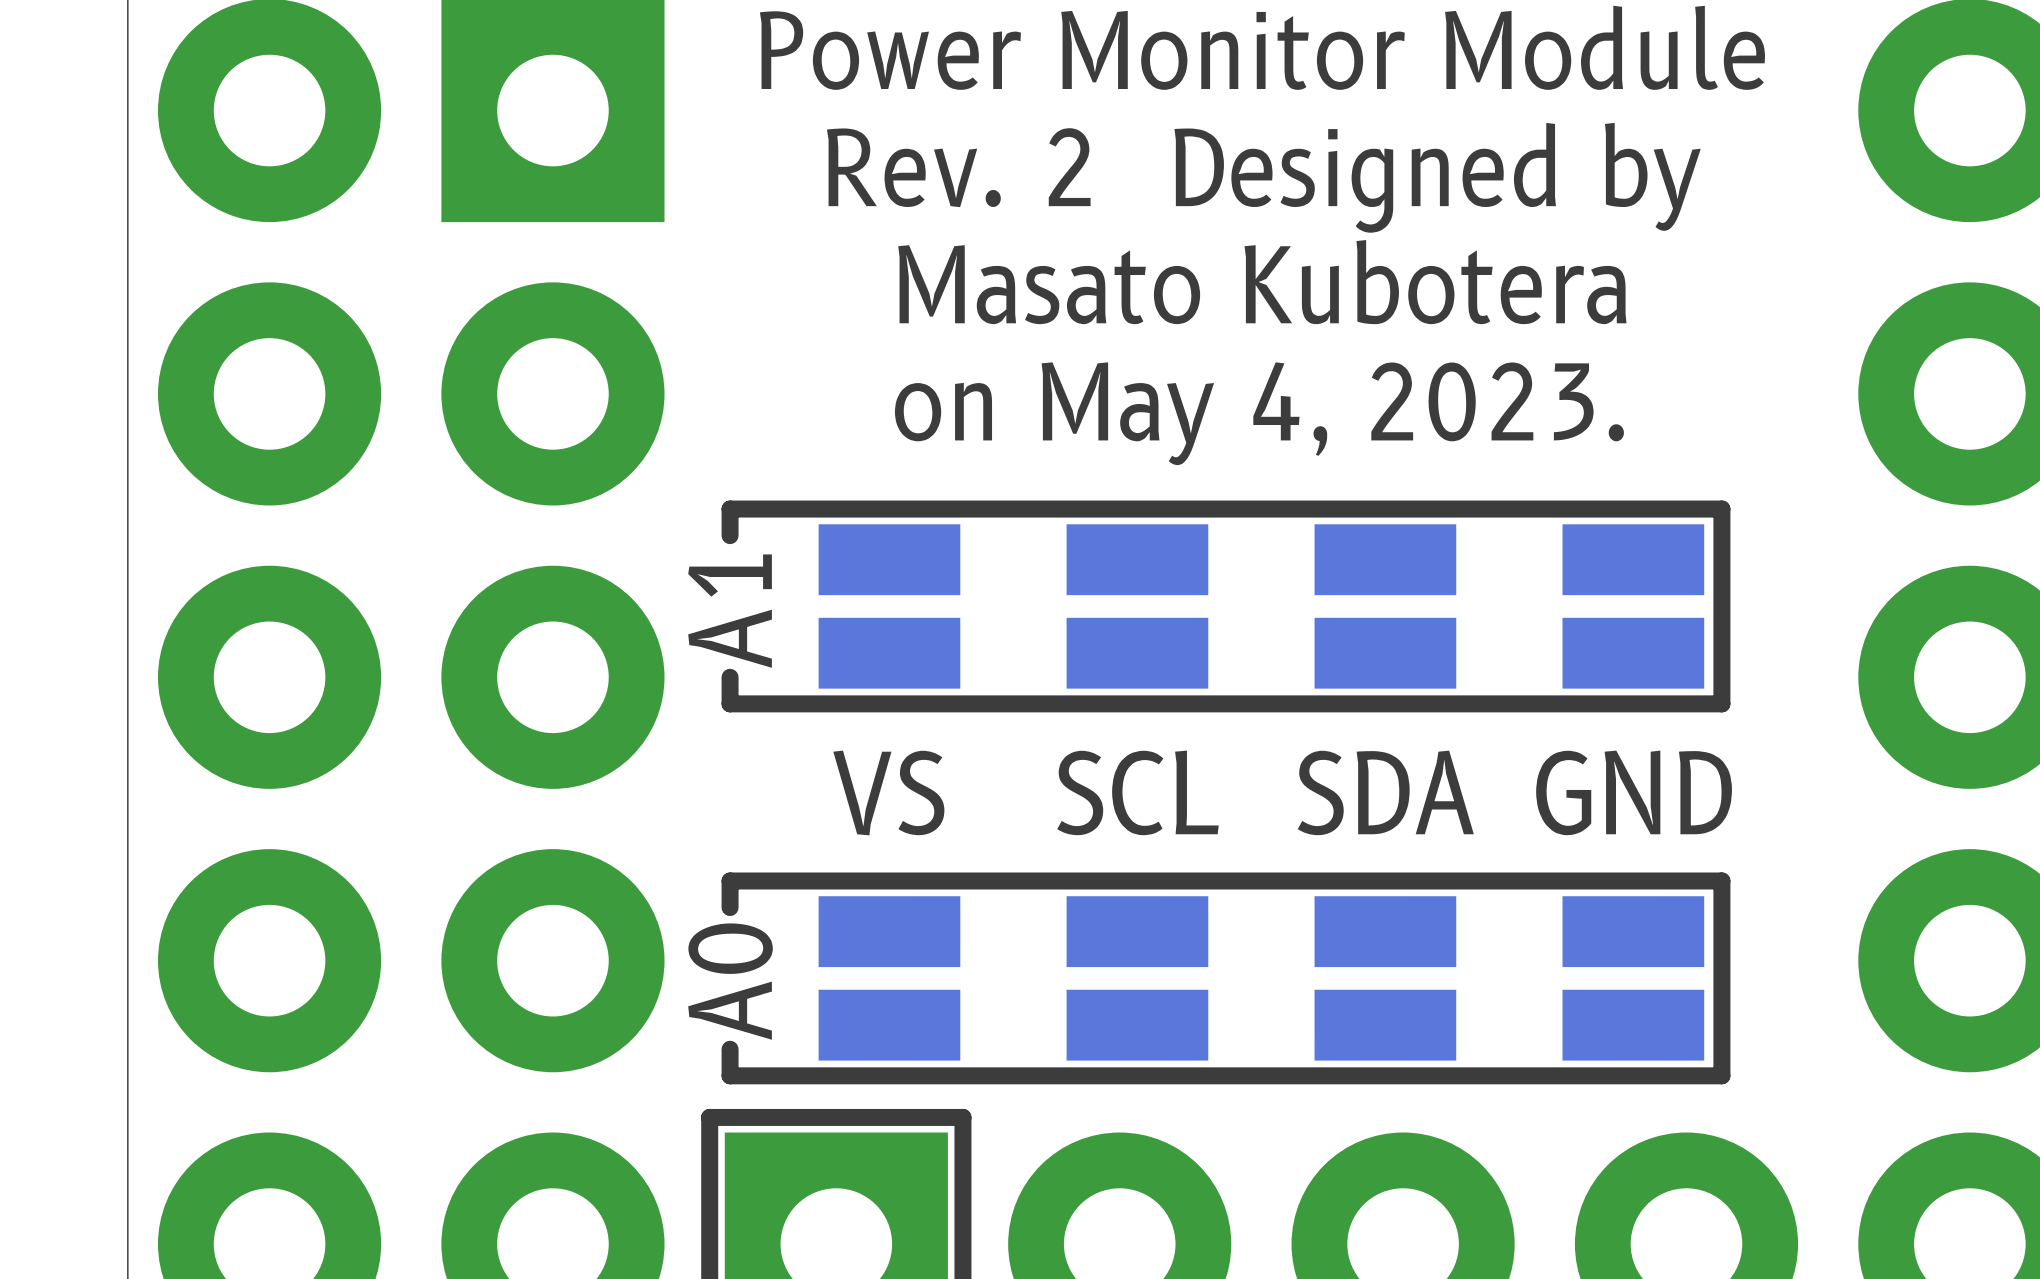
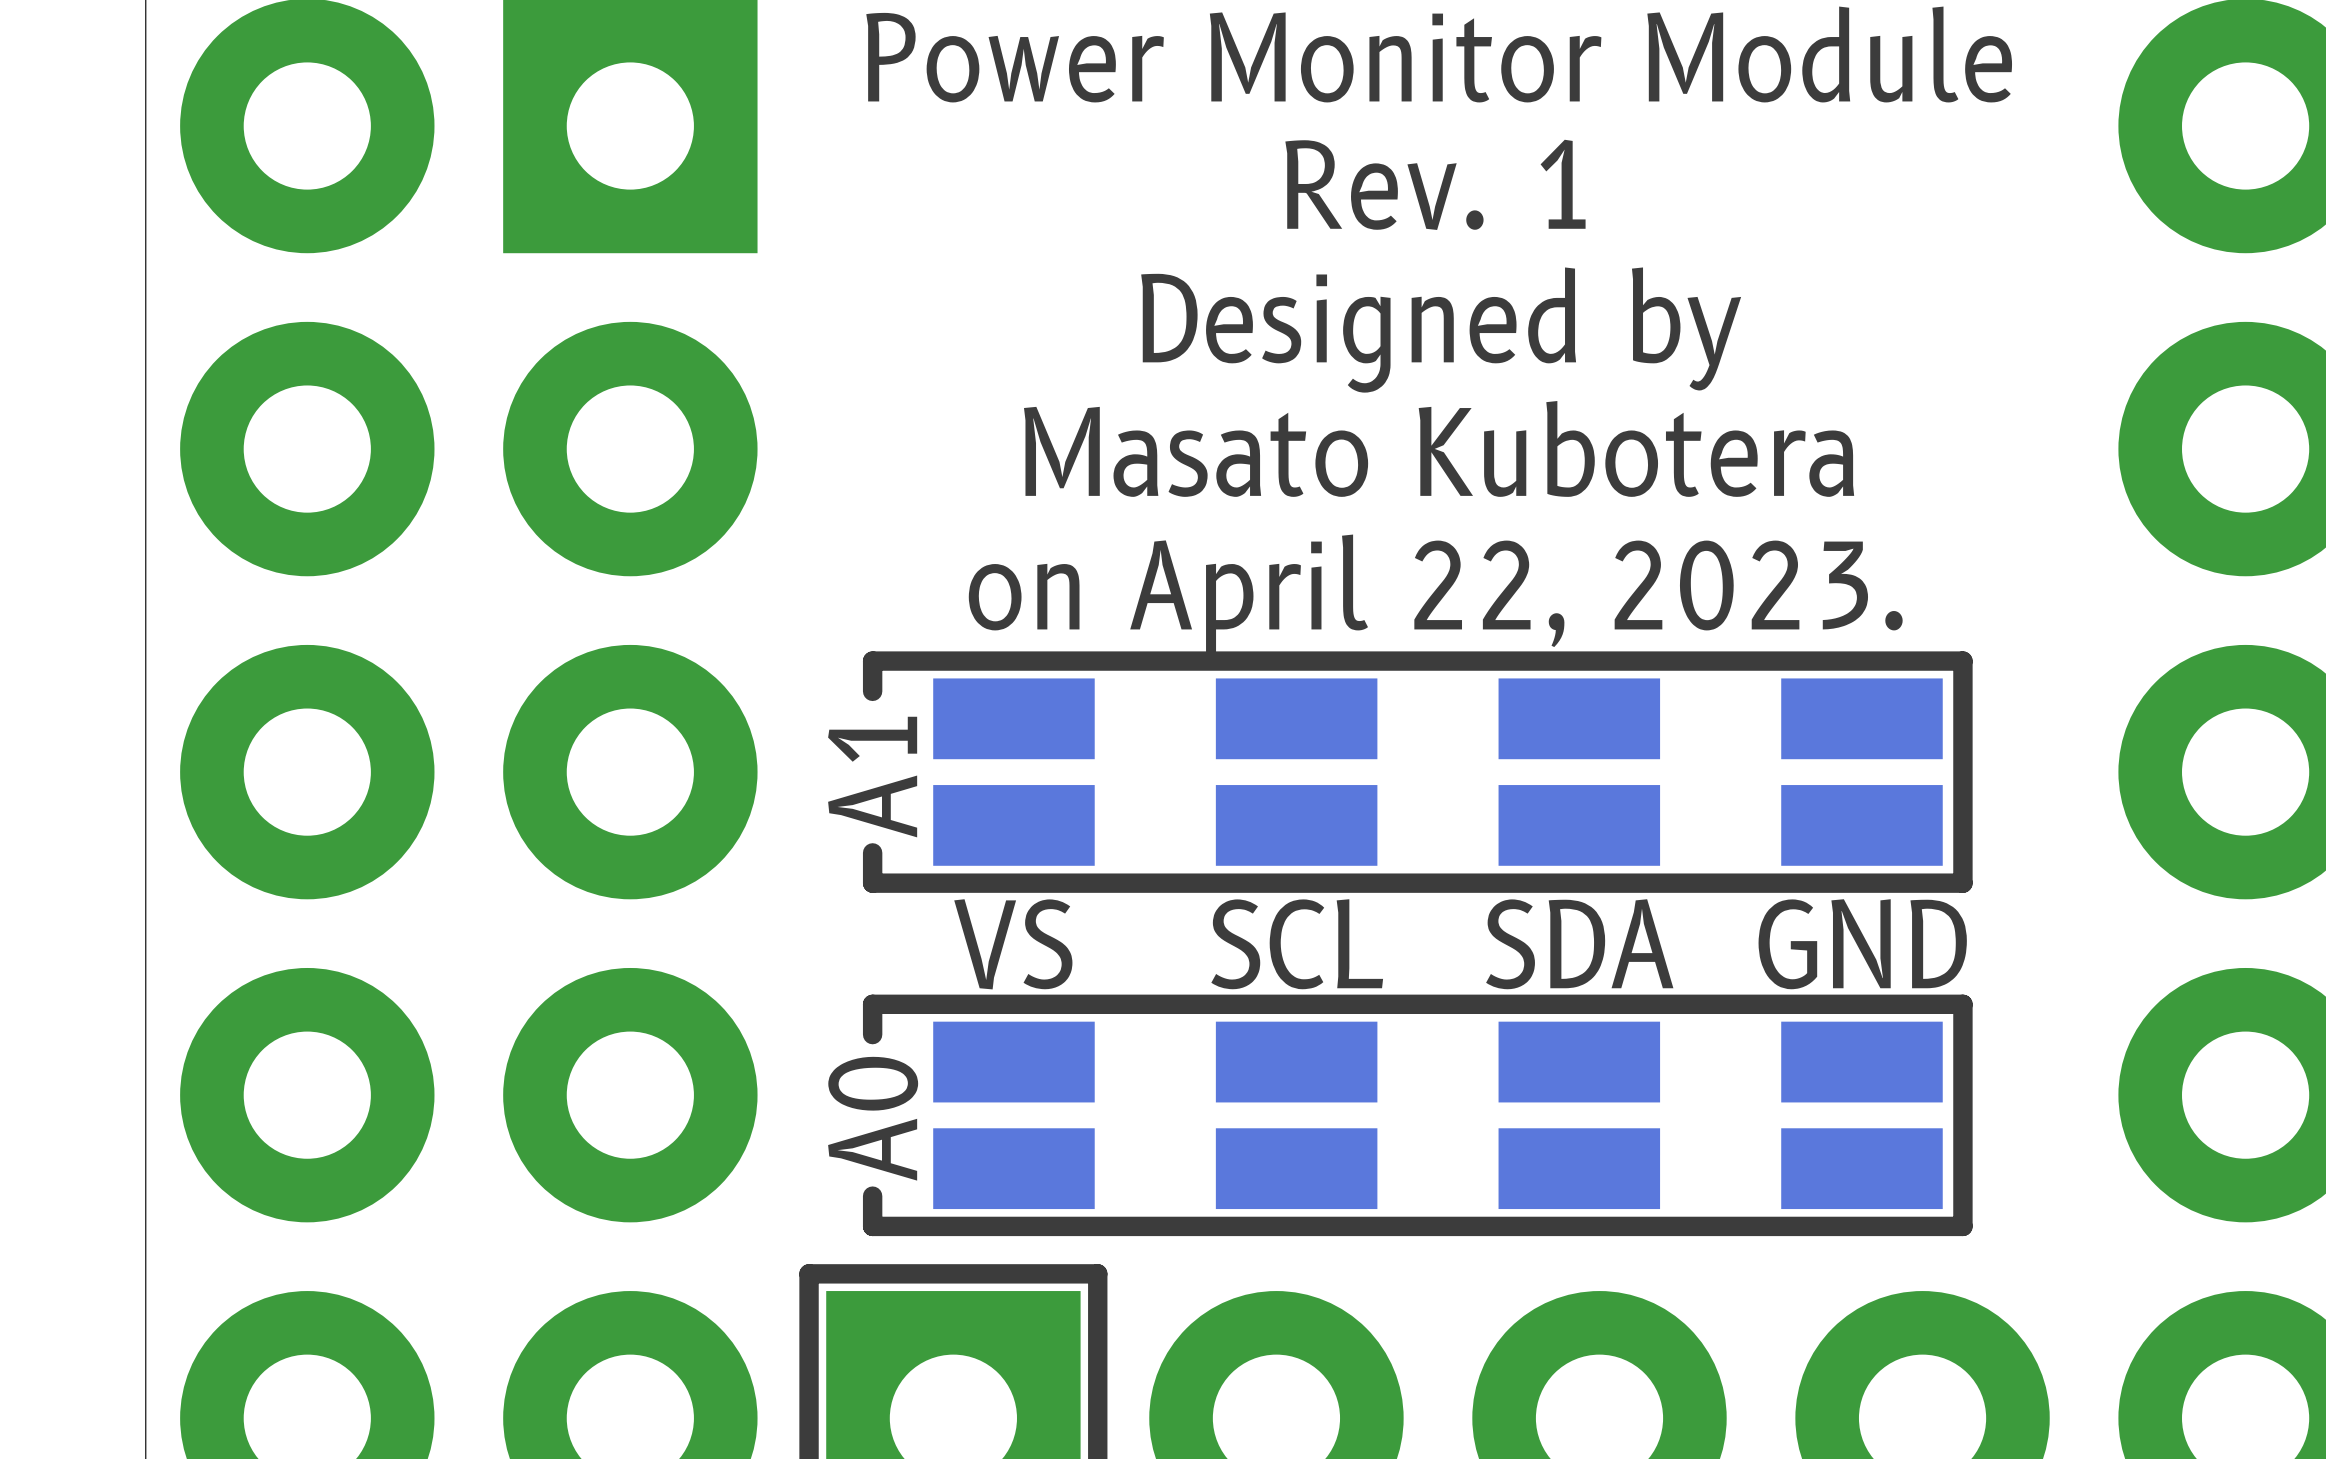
text: Rev. 2 Designed by (1263, 177) -> Rev. 1 (1435, 184)
text: Masato Kubotera (1262, 282) -> Designed by (1441, 330)
text: on May 4, 2023. (1259, 413) -> Masato Kubotera (1439, 448)
text: none -> on April 22, 2023. (1435, 596)
line: (730, 535) (730, 509) (1721, 509) (1721, 579) -> (872, 691) (872, 661) (1962, 661)
part position: (889, 606) -> (1013, 772)
part position: (1137, 606) -> (1296, 772)
part position: (1385, 606) -> (1579, 772)
part position: (1633, 606) -> (1861, 772)
text position: A1 (730, 611) -> A1 (872, 777)
line: (730, 677) (730, 703) (1721, 703) -> (872, 852) (872, 883) (1962, 883) (1962, 802)
text position: VS (888, 792) -> VS (1013, 944)
text position: SCL (1137, 792) -> SCL (1297, 944)
text position: SDA (1385, 792) -> SDA (1579, 944)
text position: GND (1634, 792) -> GND (1862, 944)
line: (765, 880) (730, 880) (730, 907) -> (872, 1004) (872, 1034)
text position: A0 (730, 981) -> A0 (873, 1118)
line: (730, 1049) (730, 1075) (765, 1075) -> (872, 1196) (872, 1226)

